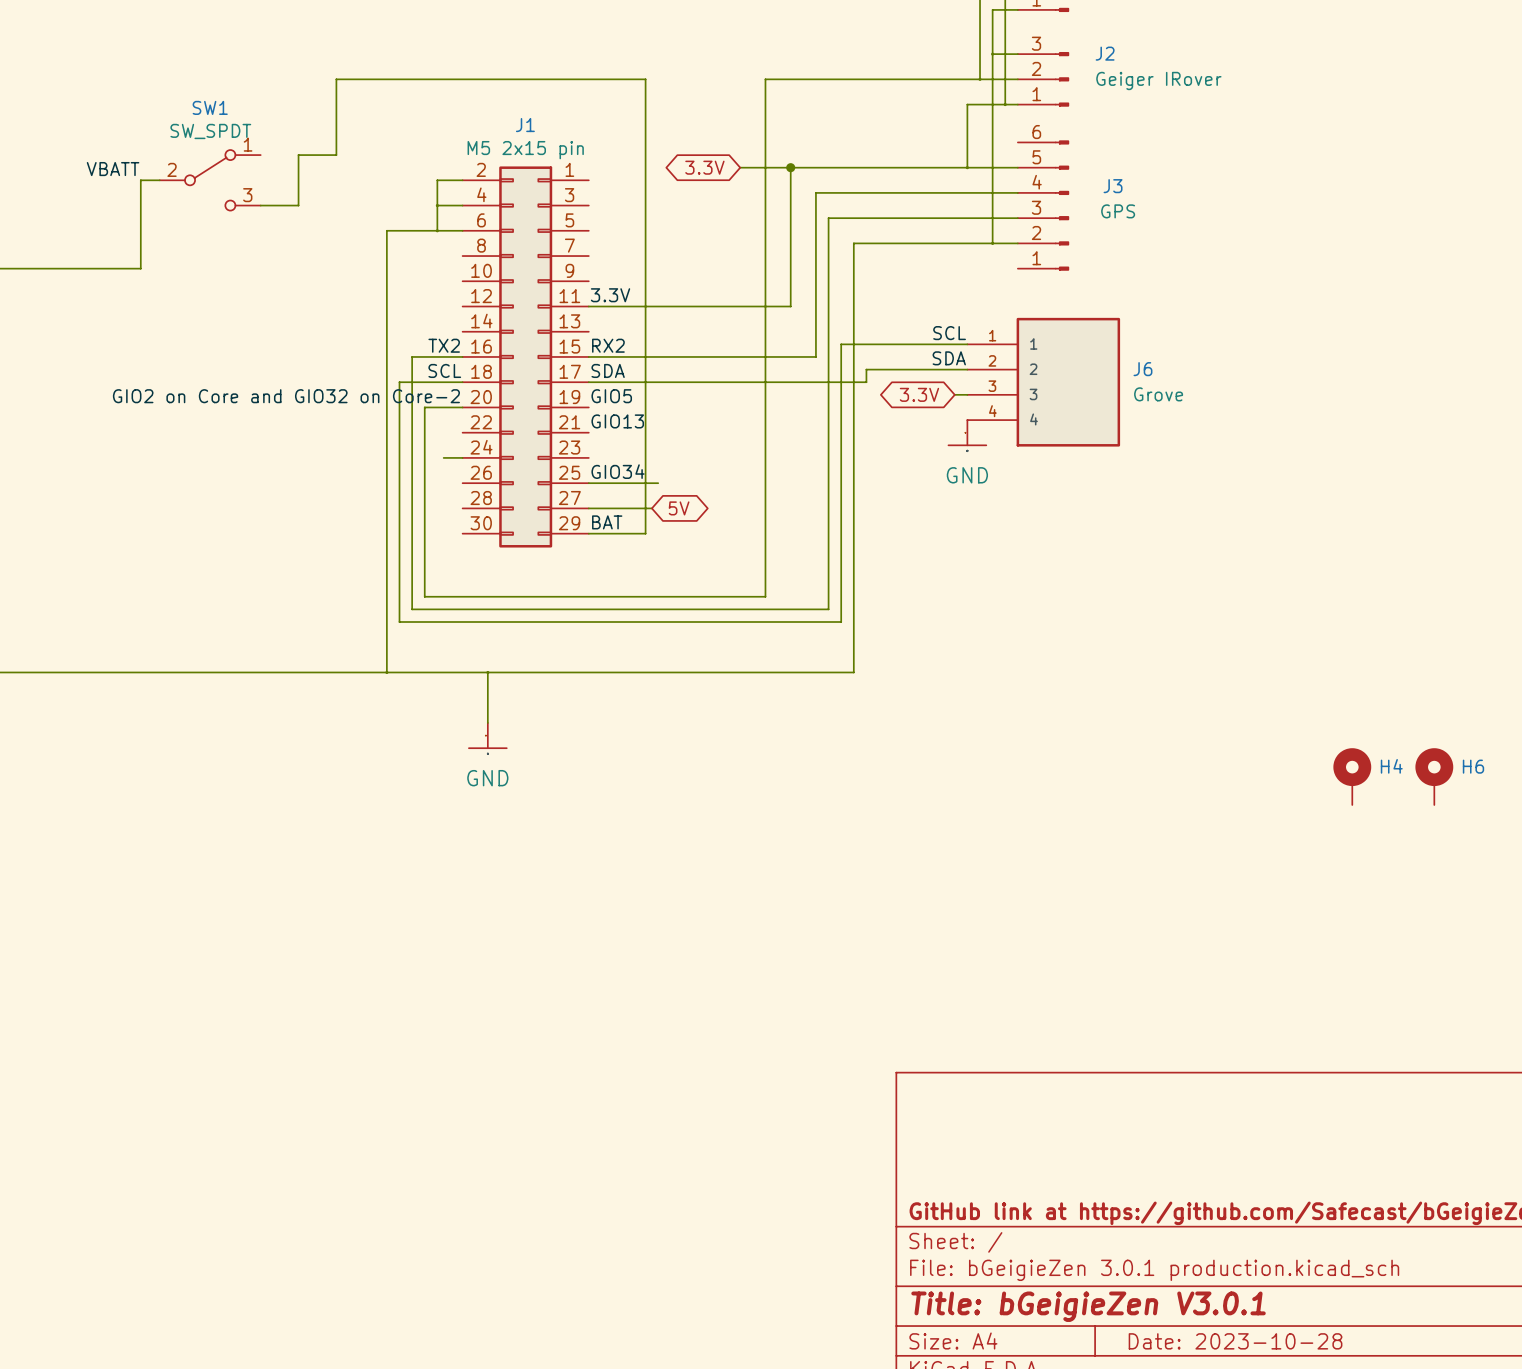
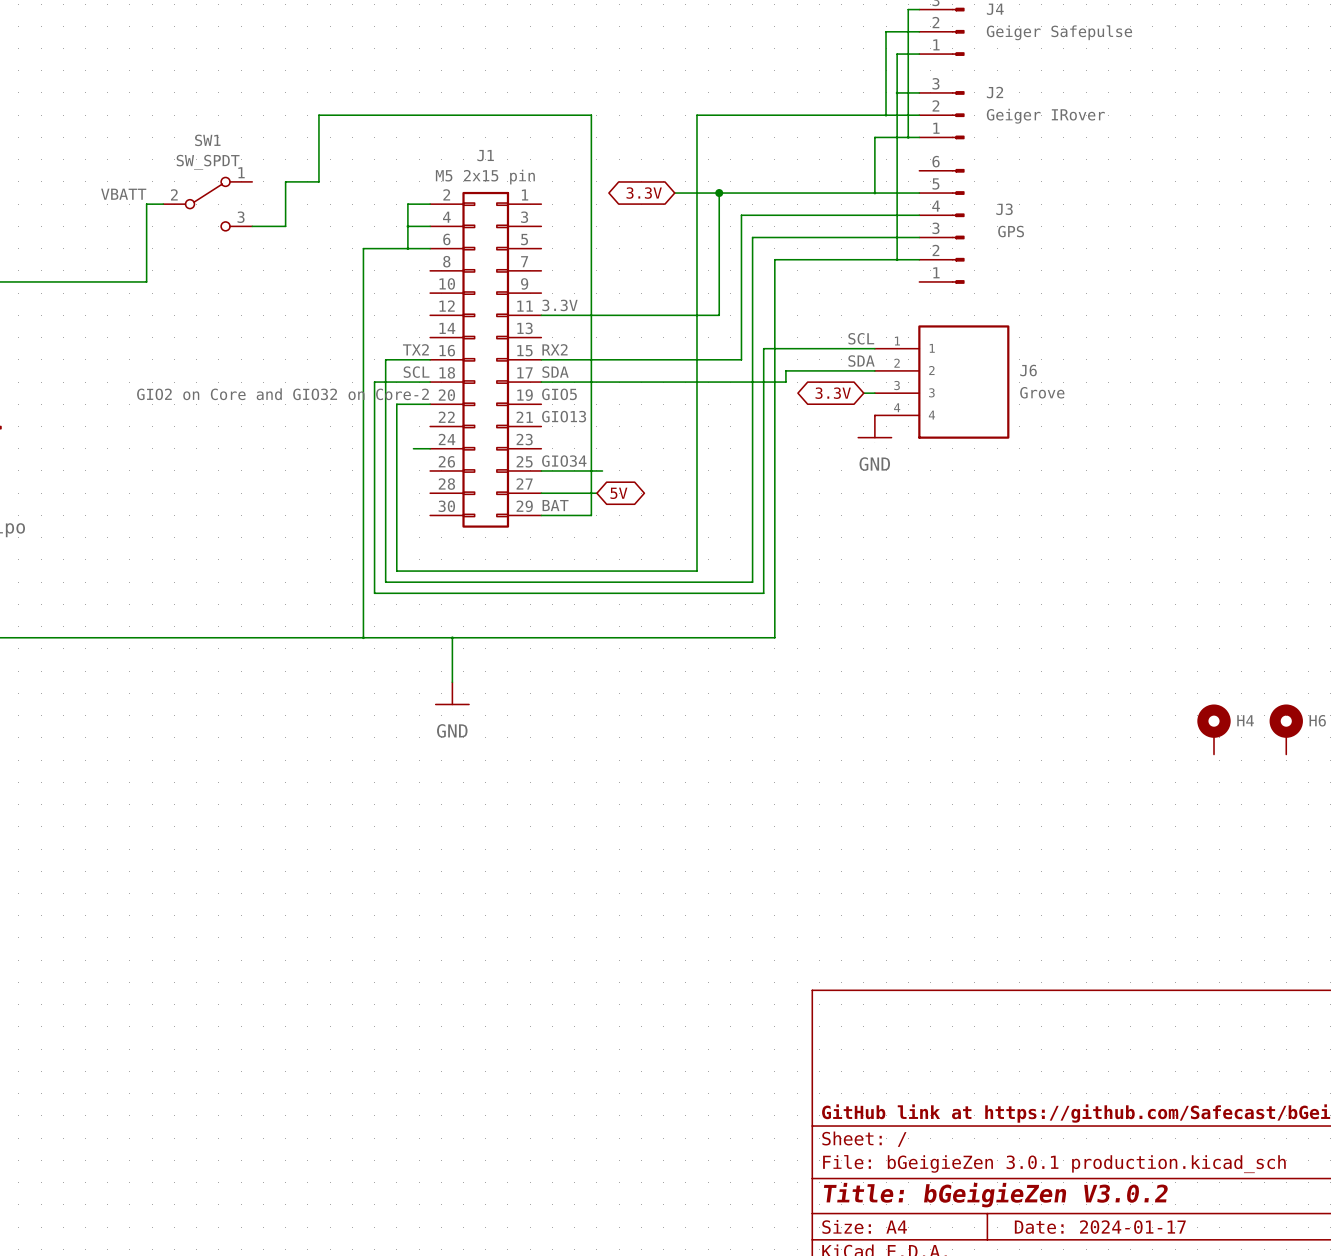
title block: Title: bGeigieZen V3.0.1 (1088, 1306) -> Title: bGeigieZen V3.0.2 (995, 1195)
title block: Date: 2023-10-28 (1235, 1341) -> Date: 2024-01-17 (1100, 1227)

